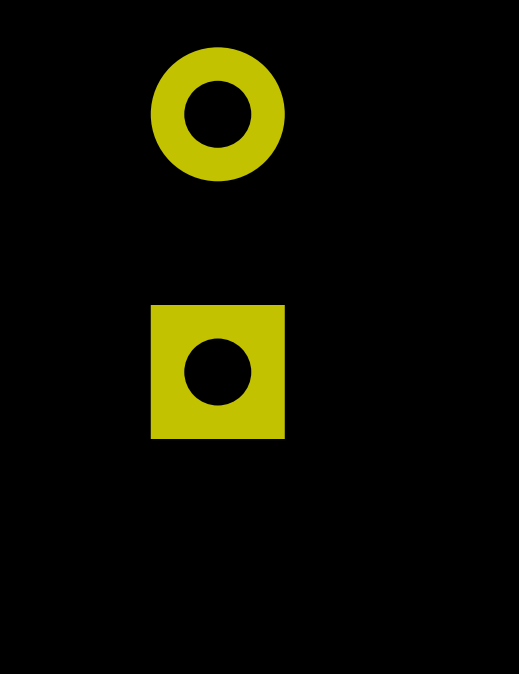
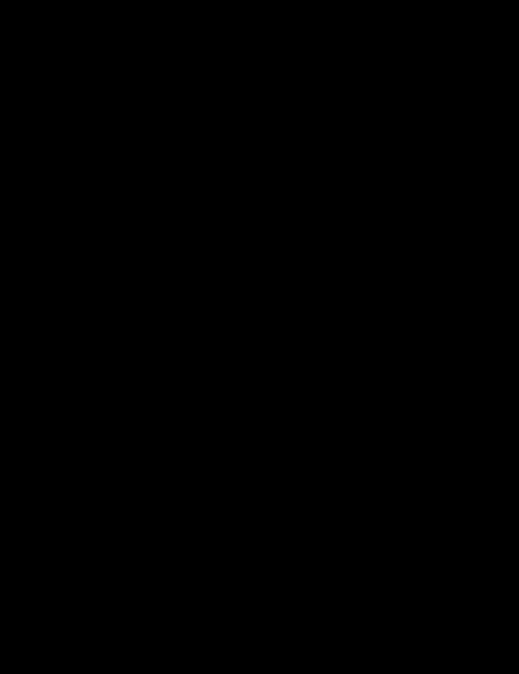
part: (217, 243) -> none

